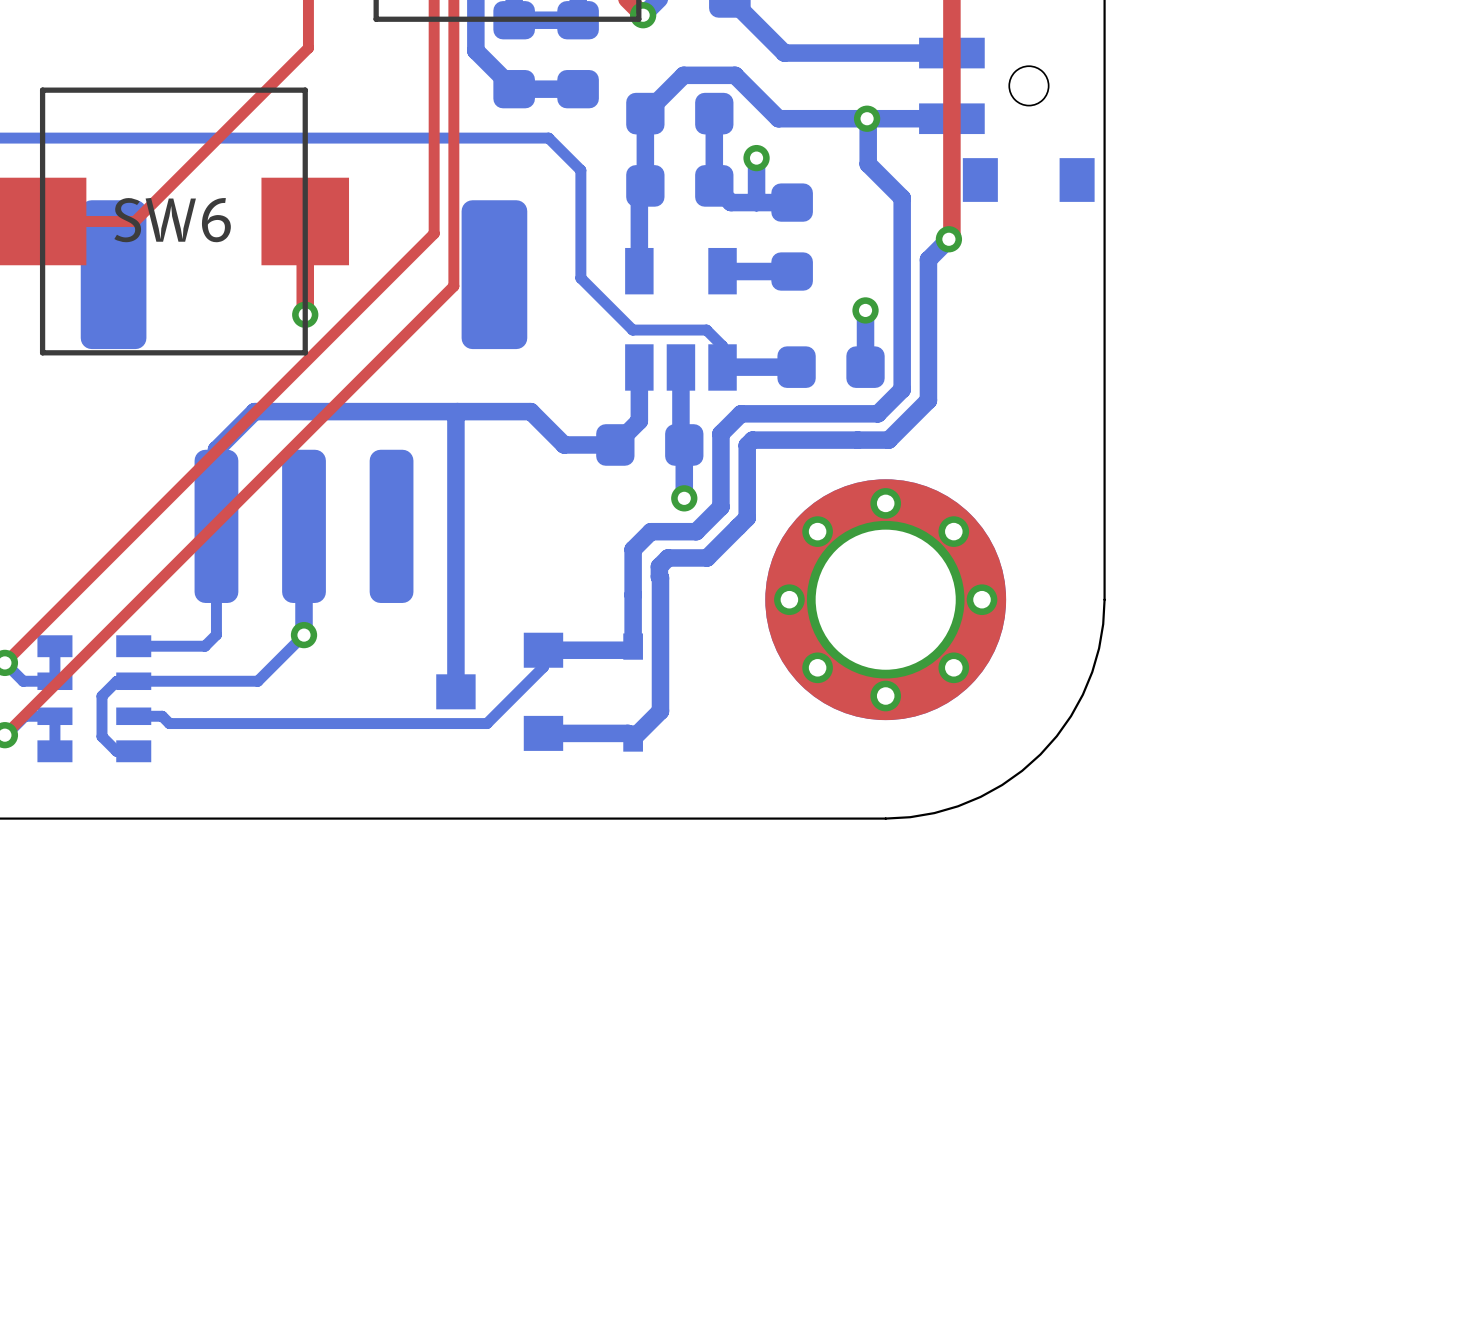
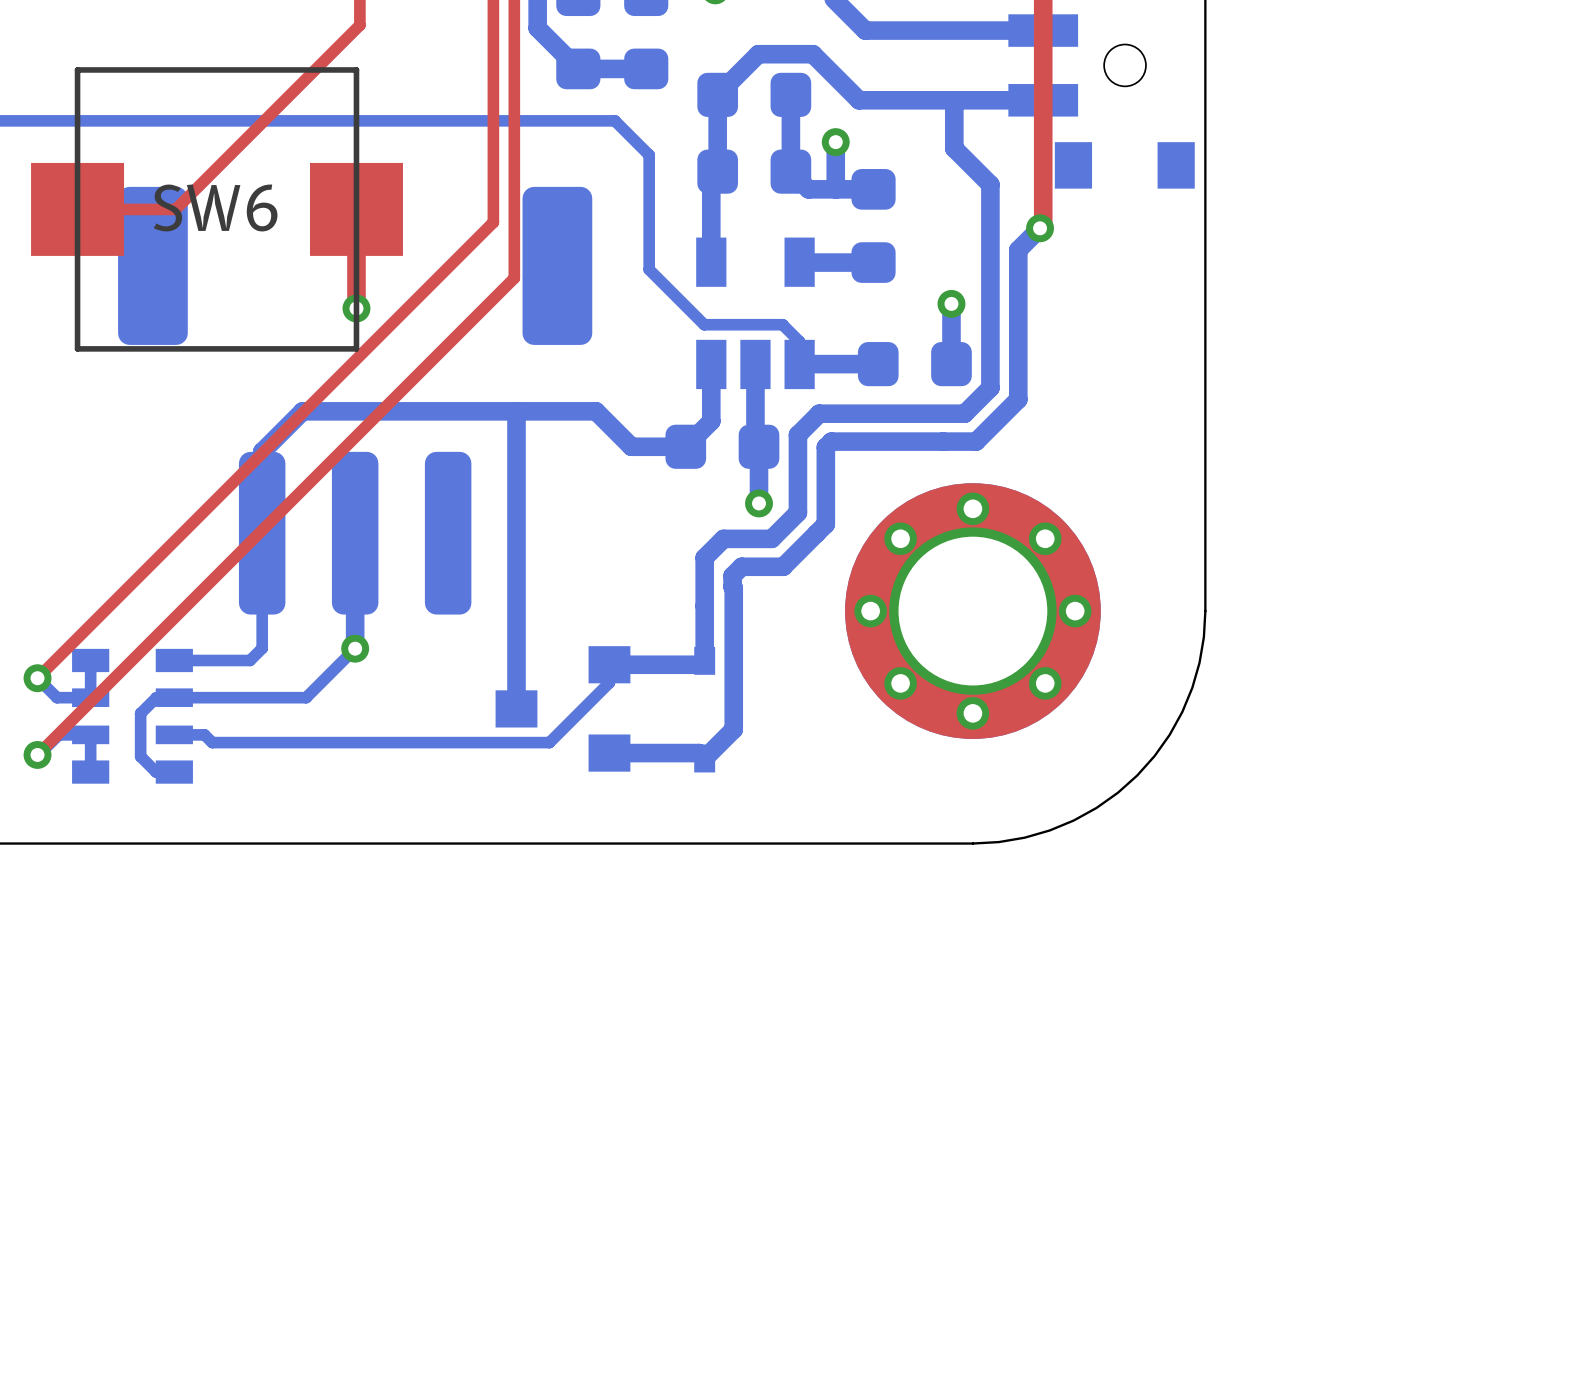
via: (867, 118) -> none

